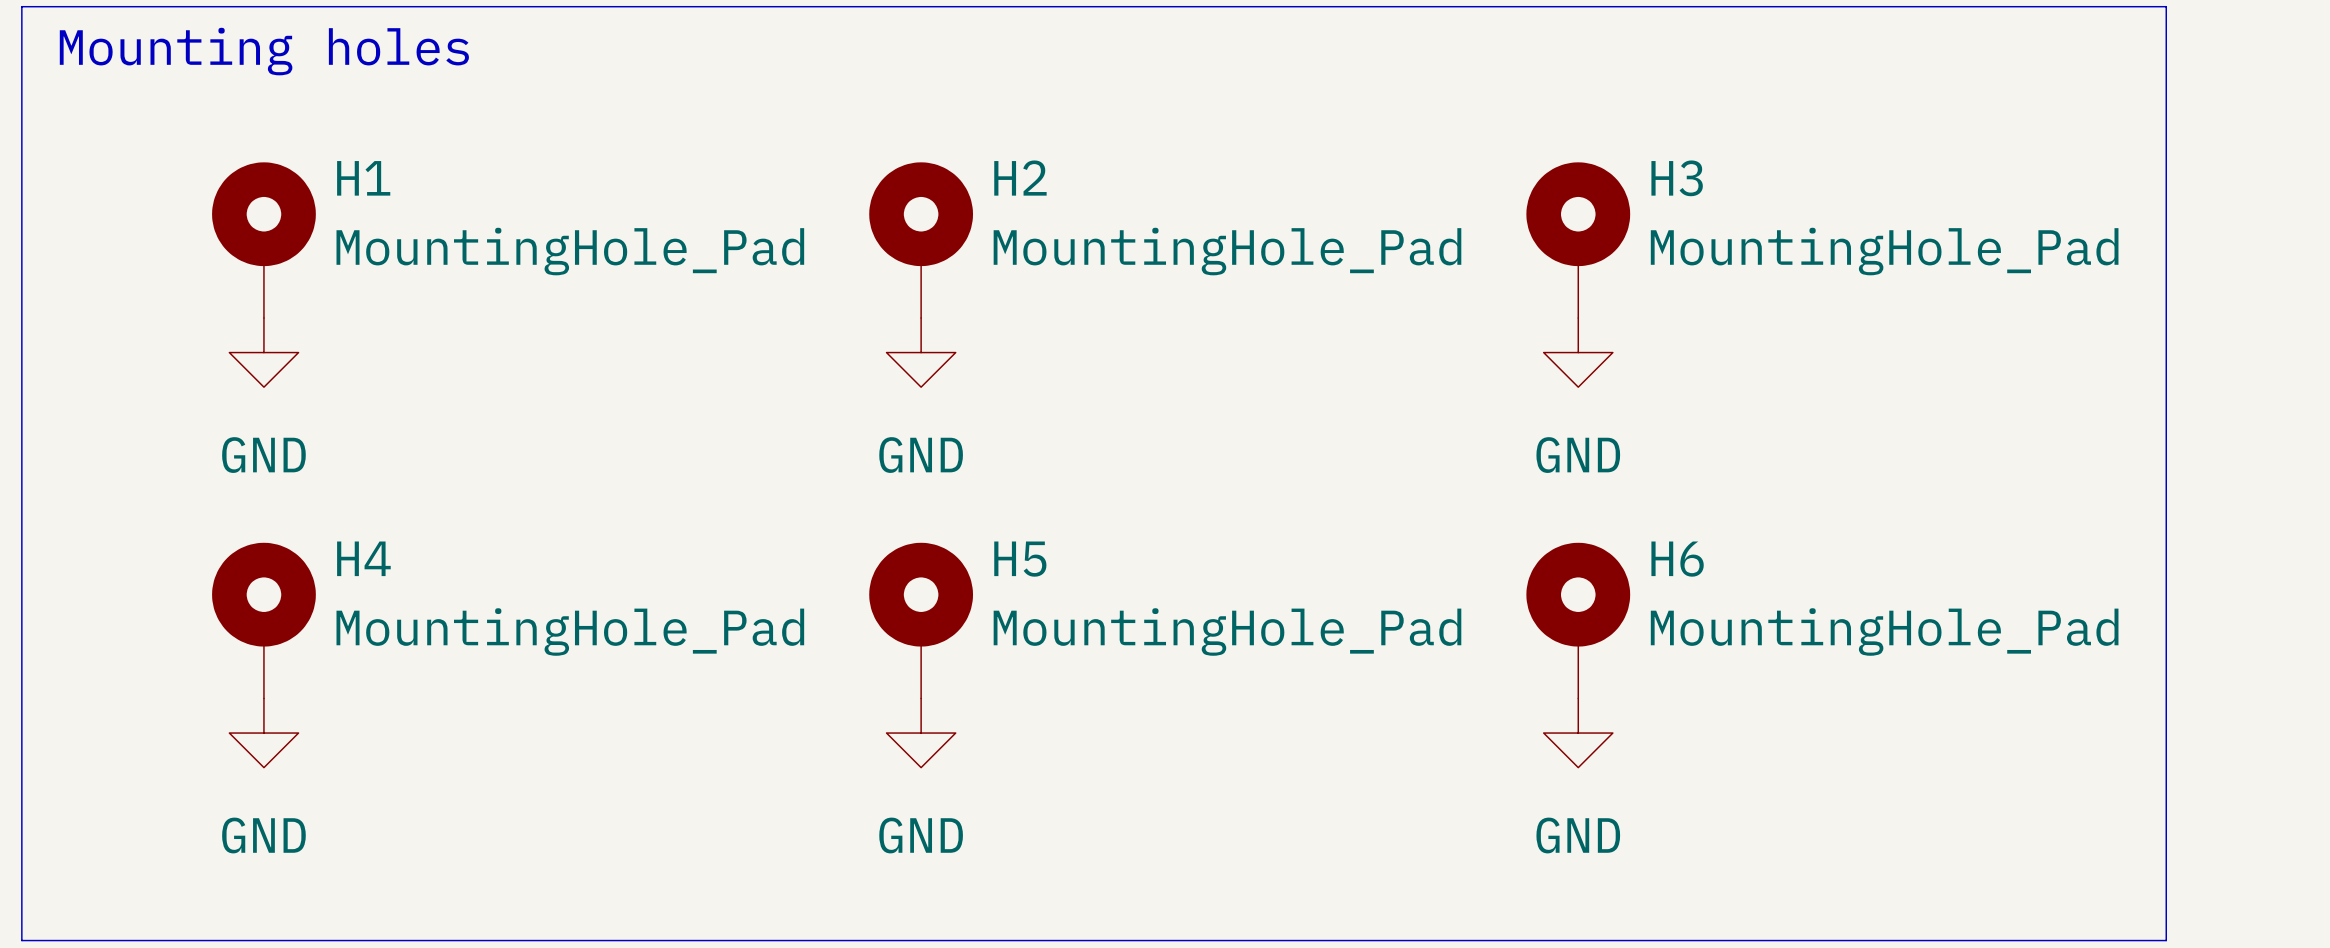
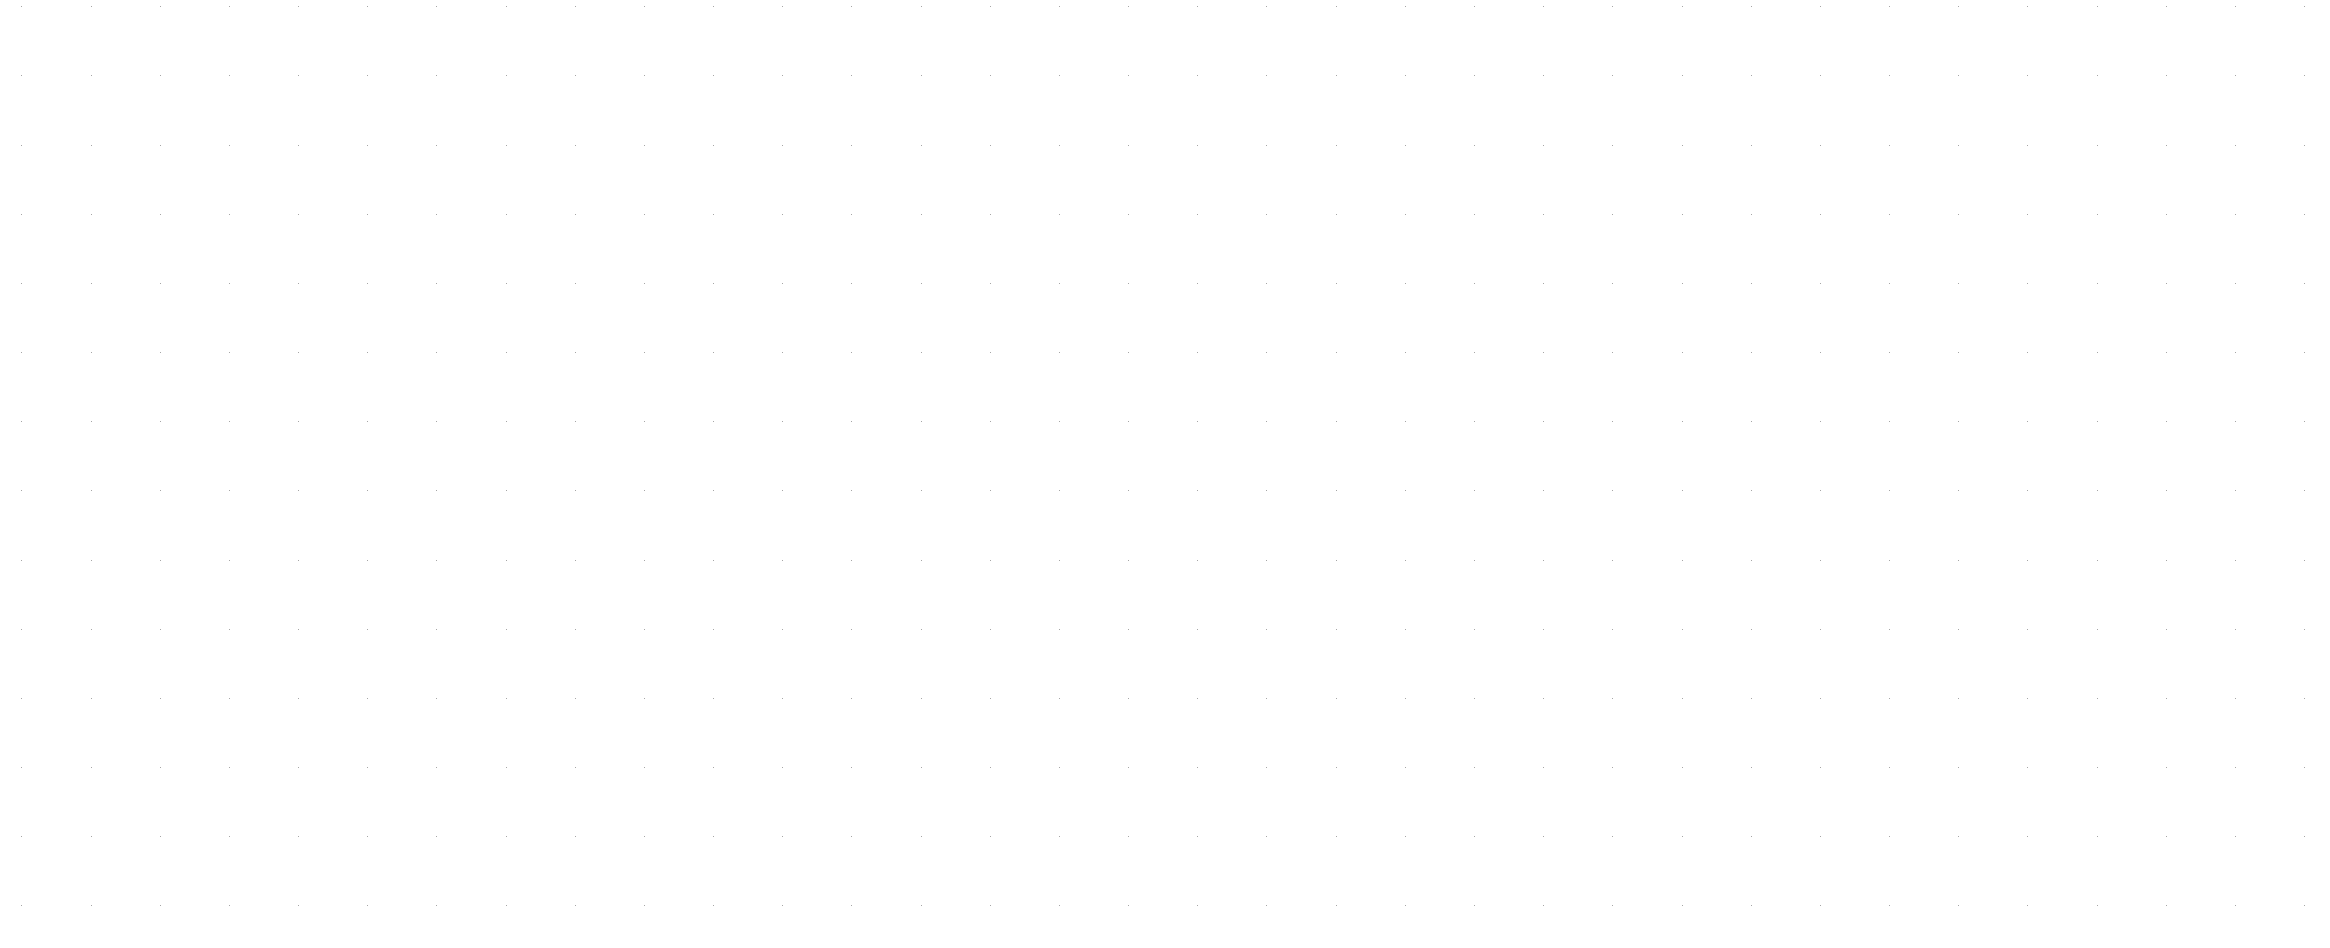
line: (21, 6) (2166, 6) (2166, 940) (21, 940) (21, 6) -> none
text: Mounting holes (264, 51) -> none
H1: MountingHole_Pad (263, 240) -> none
H2: MountingHole_Pad (921, 240) -> none
H3: MountingHole_Pad (1578, 240) -> none
power symbol: GND (263, 352) -> none
power symbol: GND (921, 352) -> none
power symbol: GND (1578, 352) -> none
H4: MountingHole_Pad (263, 620) -> none
H5: MountingHole_Pad (921, 620) -> none
H6: MountingHole_Pad (1578, 620) -> none
power symbol: GND (263, 733) -> none
power symbol: GND (921, 733) -> none
power symbol: GND (1578, 733) -> none

